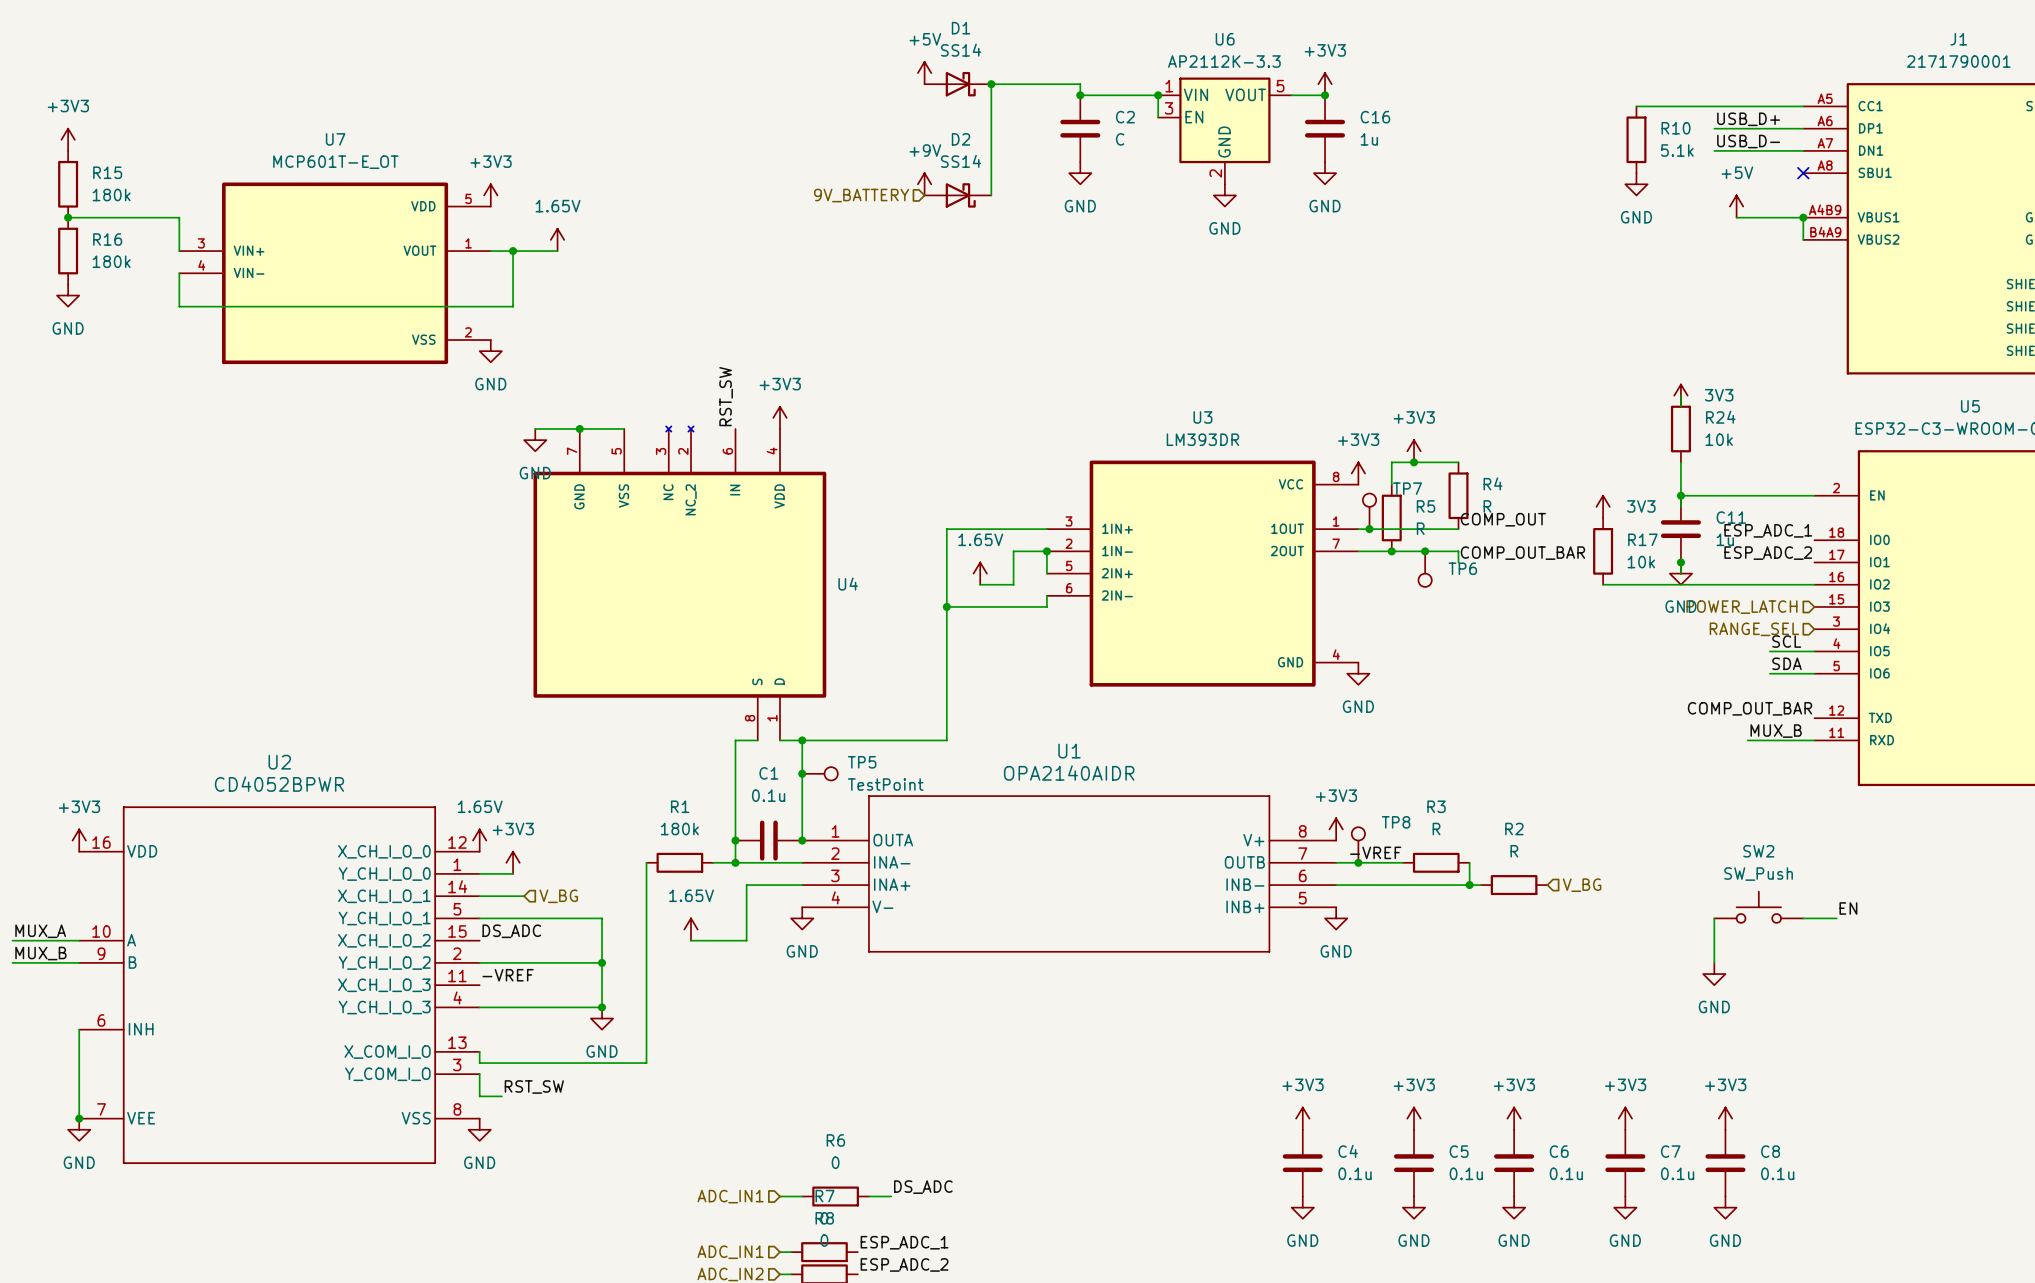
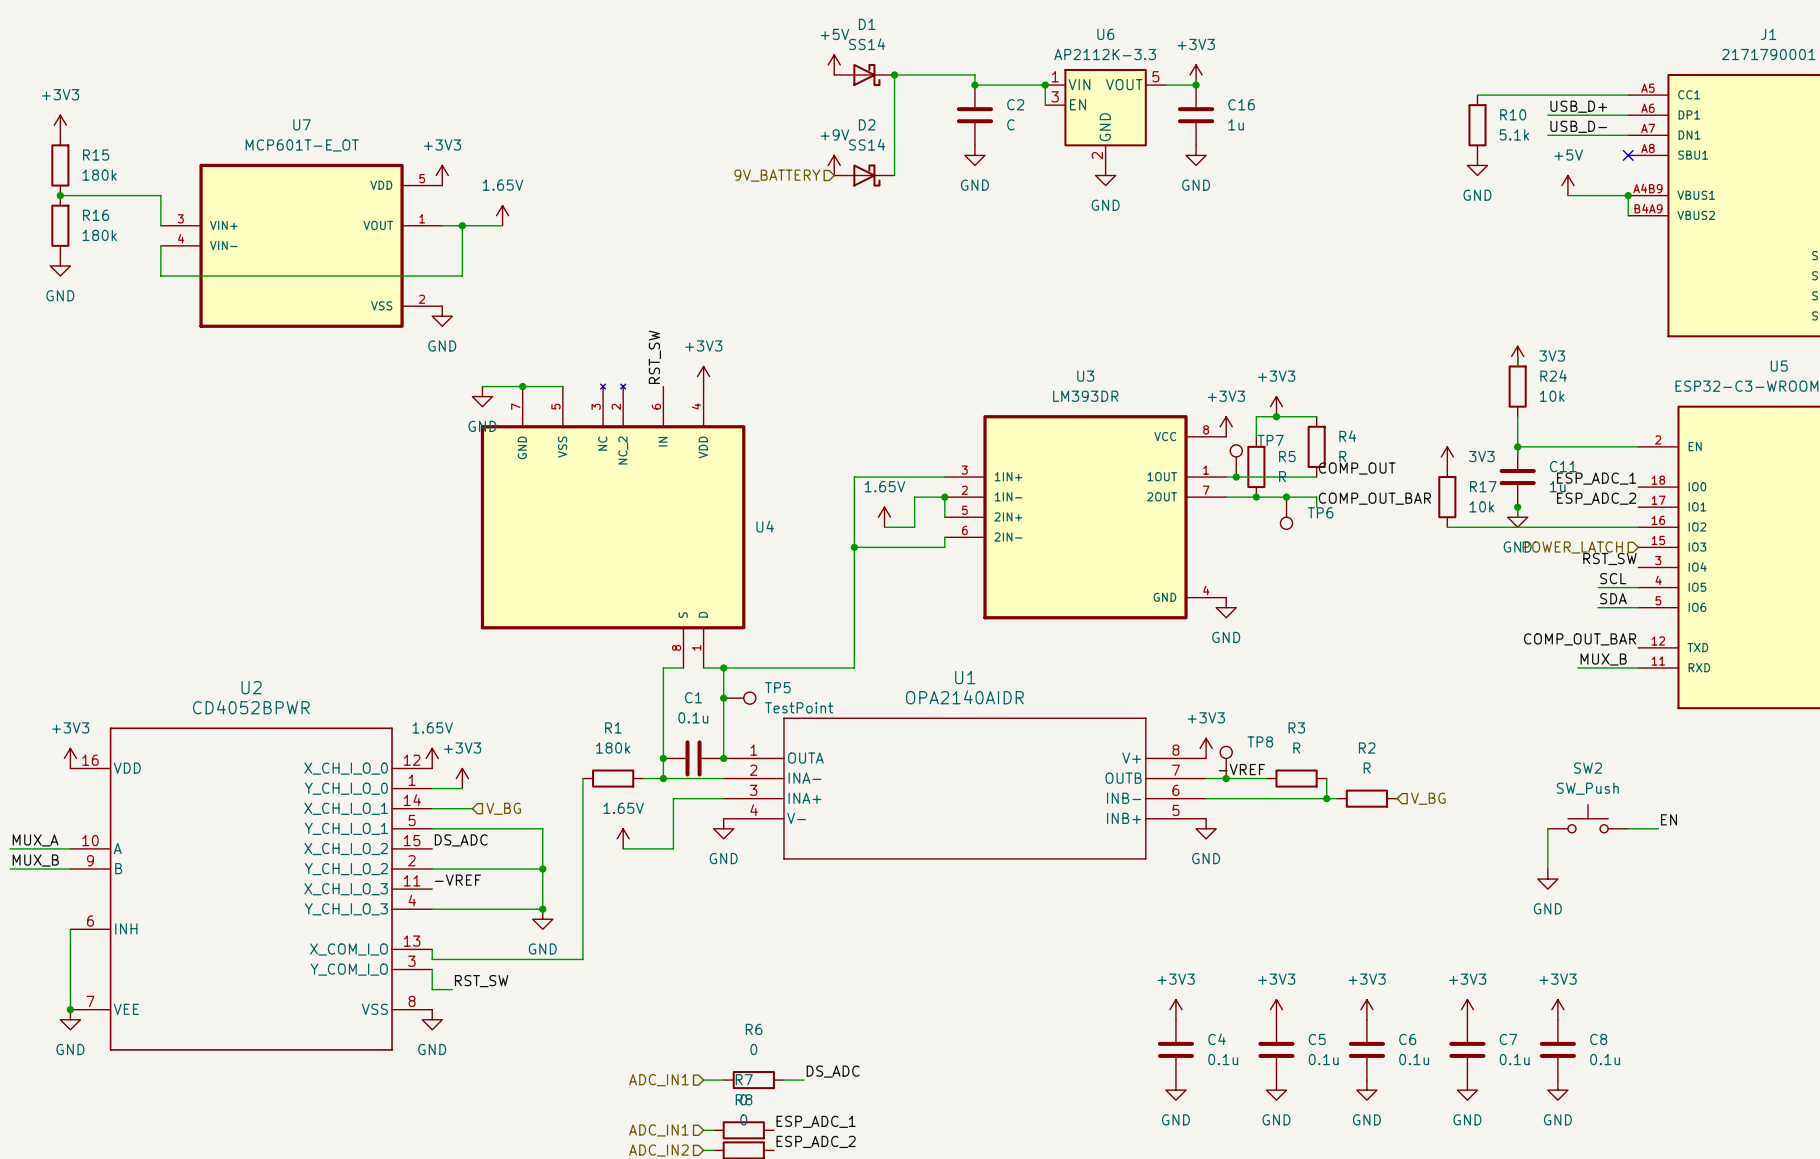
label: none -> RST_SW (1609, 558)
hierarchical label: RANGE_SEL (1754, 629) -> none

